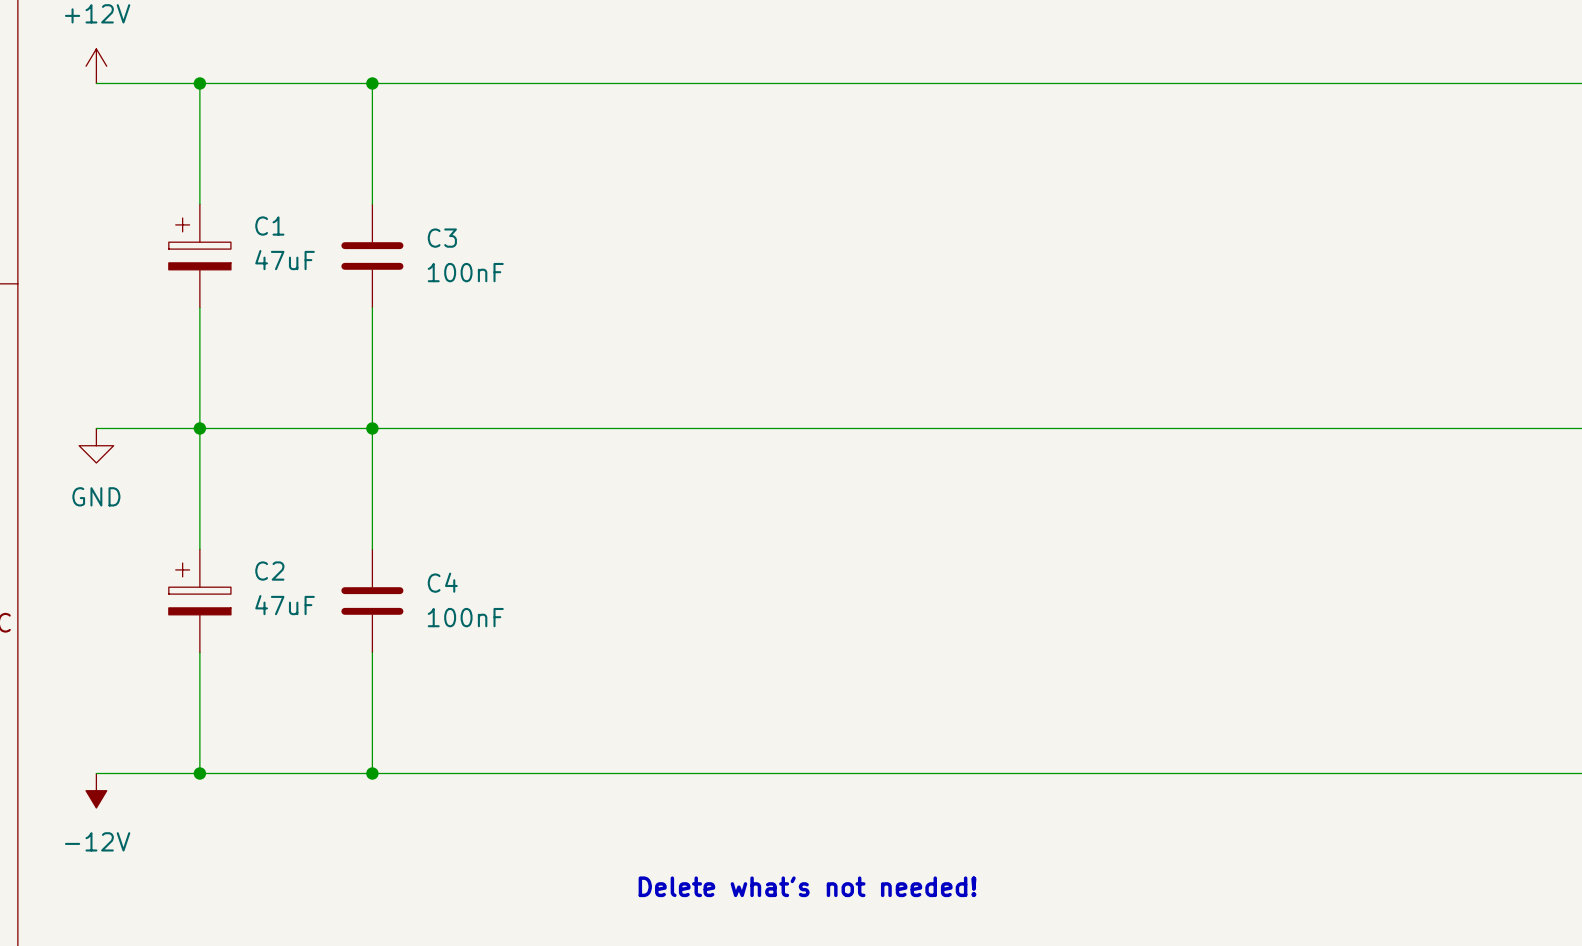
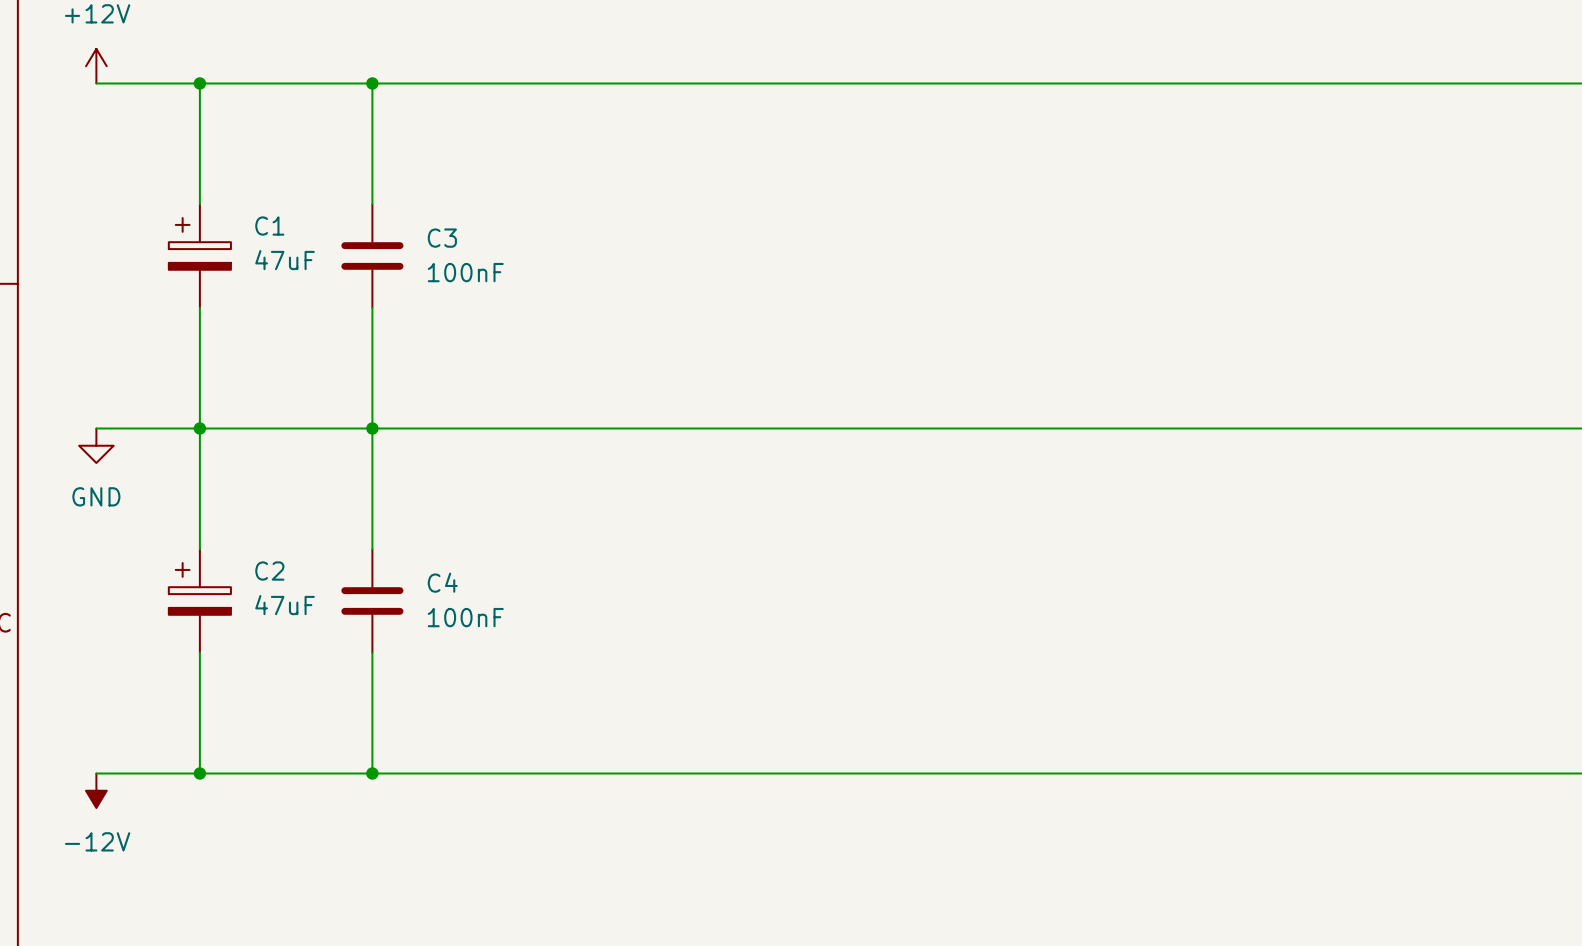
text: Delete what's not needed! (807, 886) -> none

